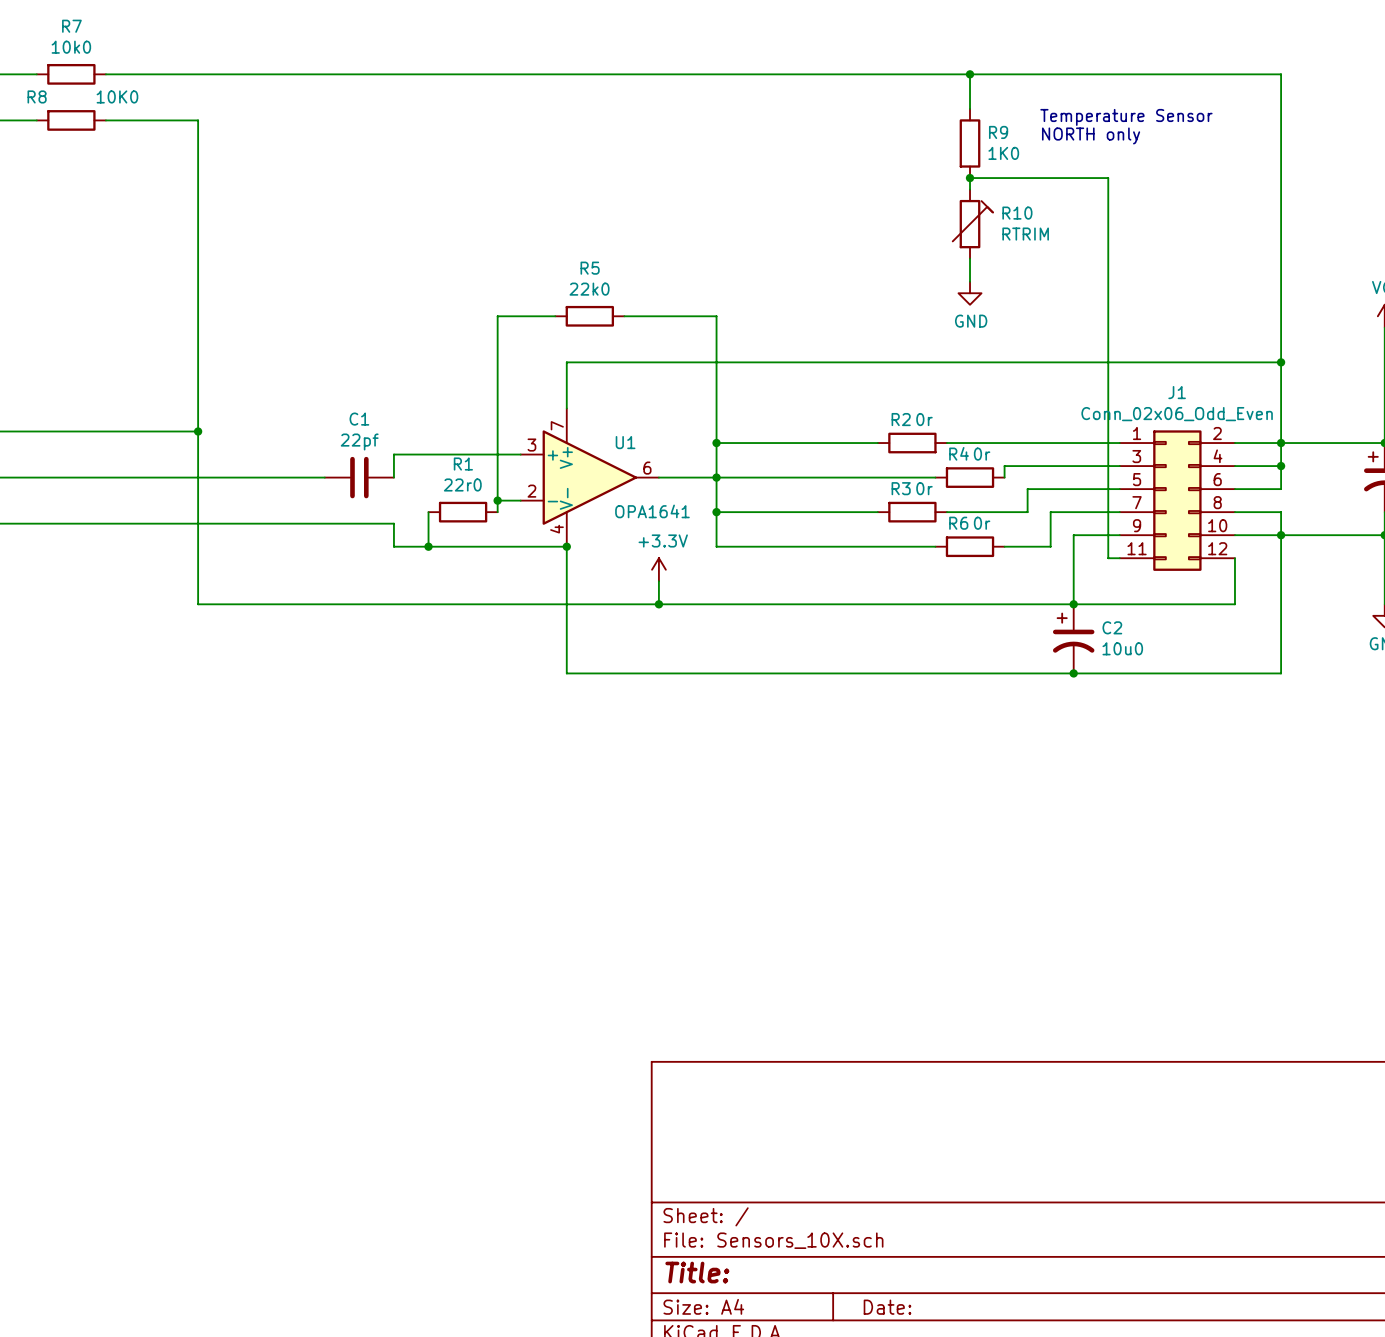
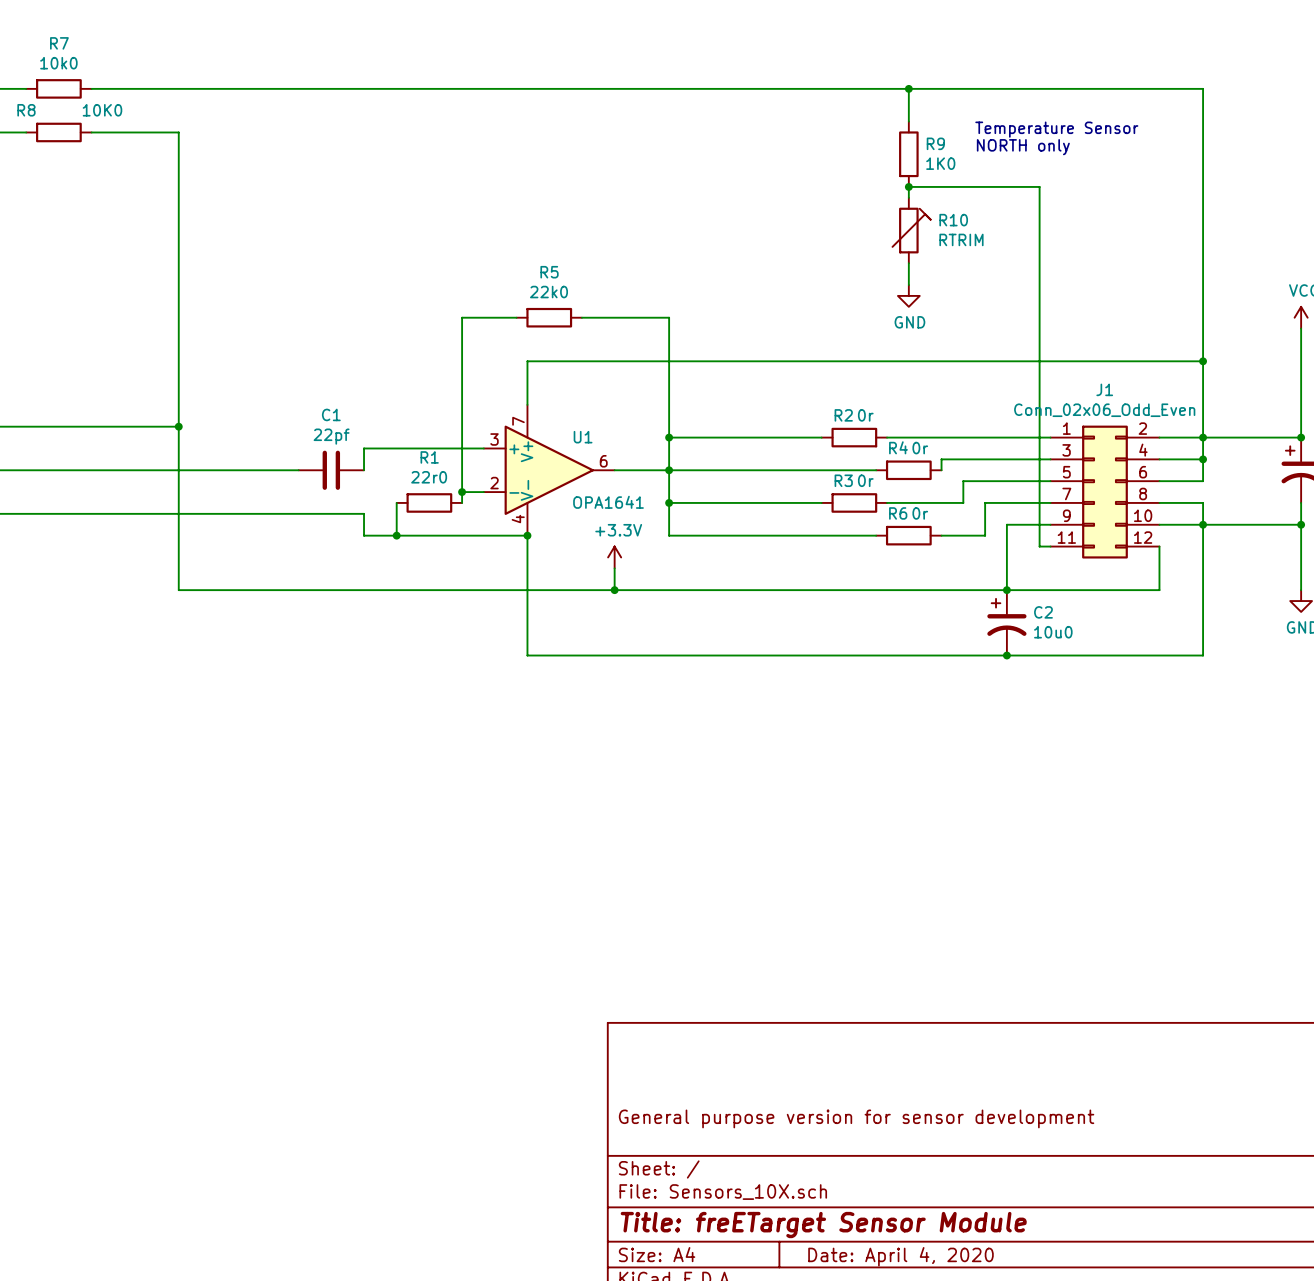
title block: none -> General purpose version for sensor development (856, 1118)
title block: Title: (697, 1272) -> Title: freETarget Sensor Module (823, 1225)
title block: Date: (887, 1307) -> Date: April 4, 2020 (900, 1256)

